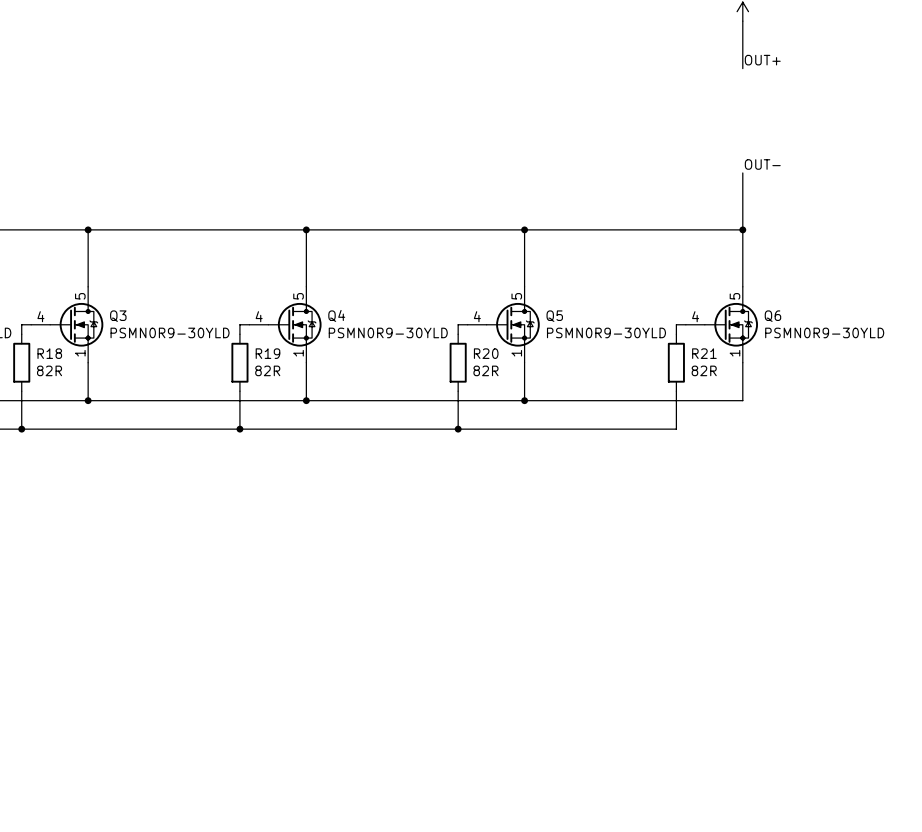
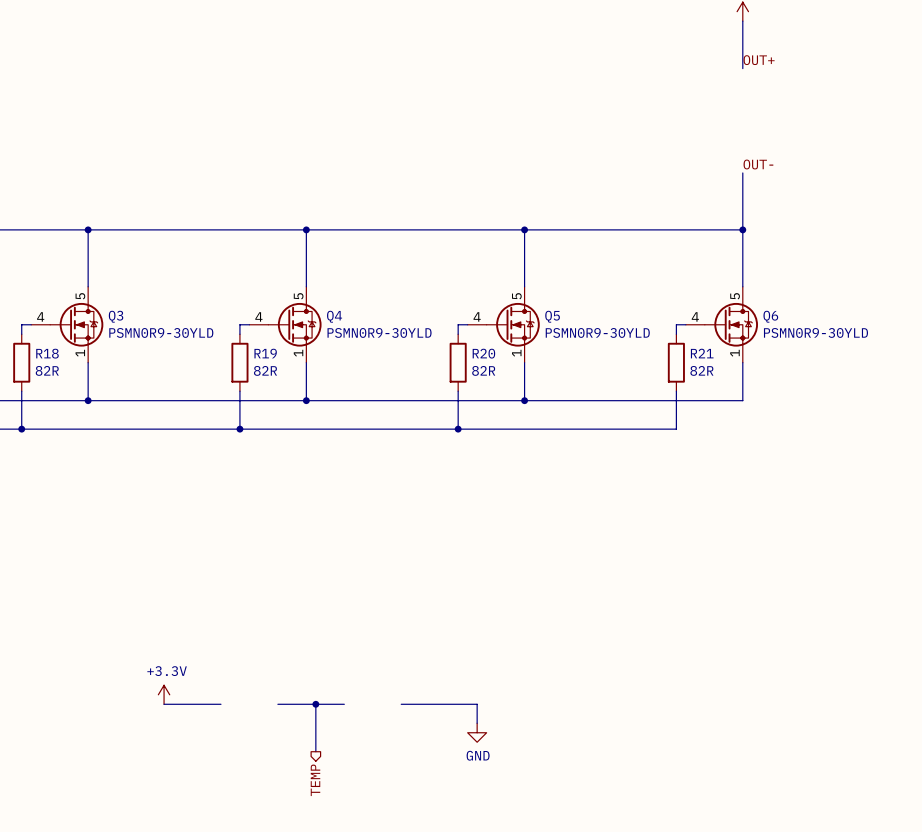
power symbol: none -> +3.3V (164, 694)
wire: none -> (164, 704) (220, 704)
wire: none -> (277, 704) (344, 704)
wire: none -> (315, 704) (315, 751)
junction: none -> (315, 704)
wire: none -> (401, 704) (477, 704) (477, 723)
power symbol: none -> GND (477, 732)
hierarchical label: none -> TEMP (315, 780)

